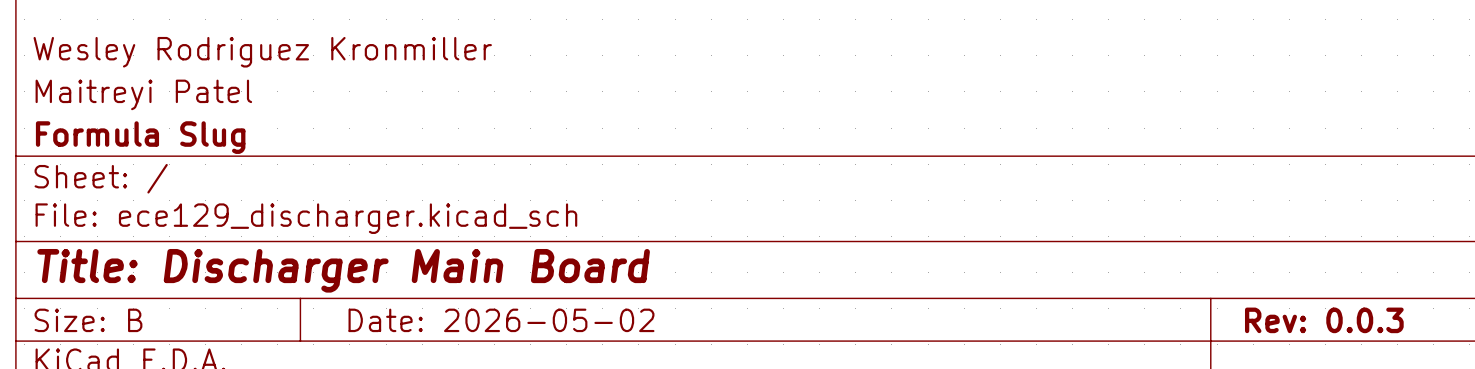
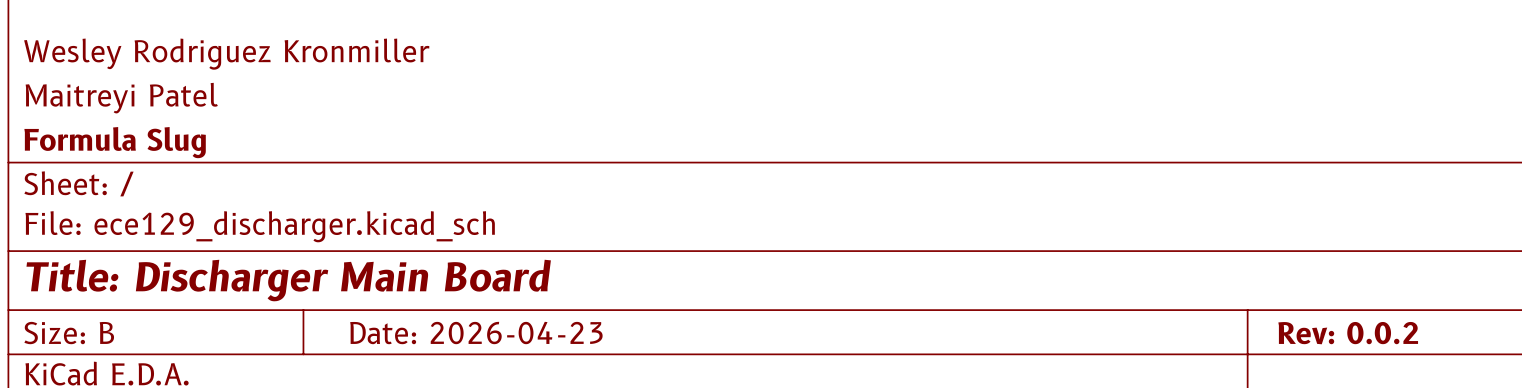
title block: Date: 2026-05-02 (501, 320) -> Date: 2026-04-23 (476, 333)
title block: Rev: 0.0.3 (1324, 320) -> Rev: 0.0.2 (1348, 333)

